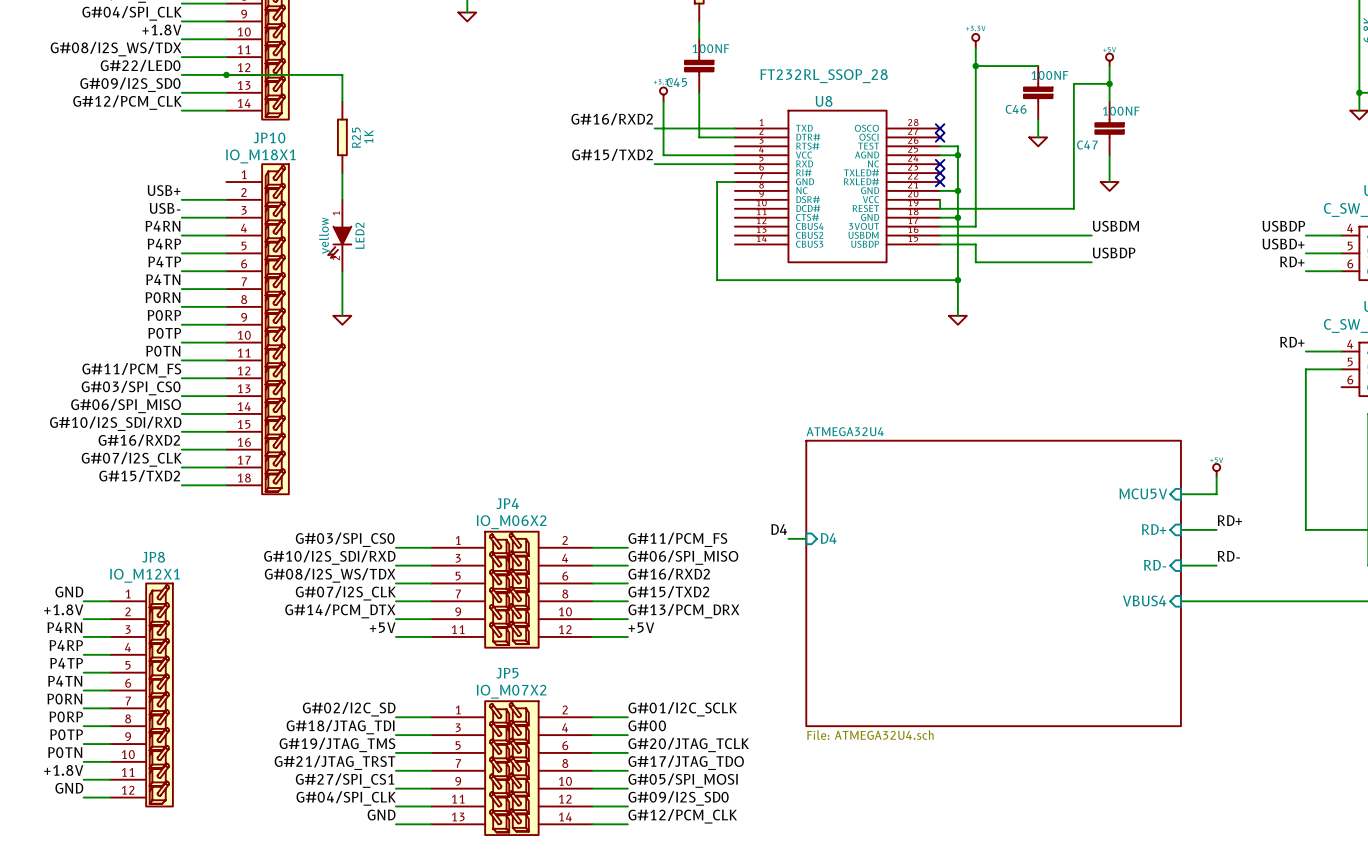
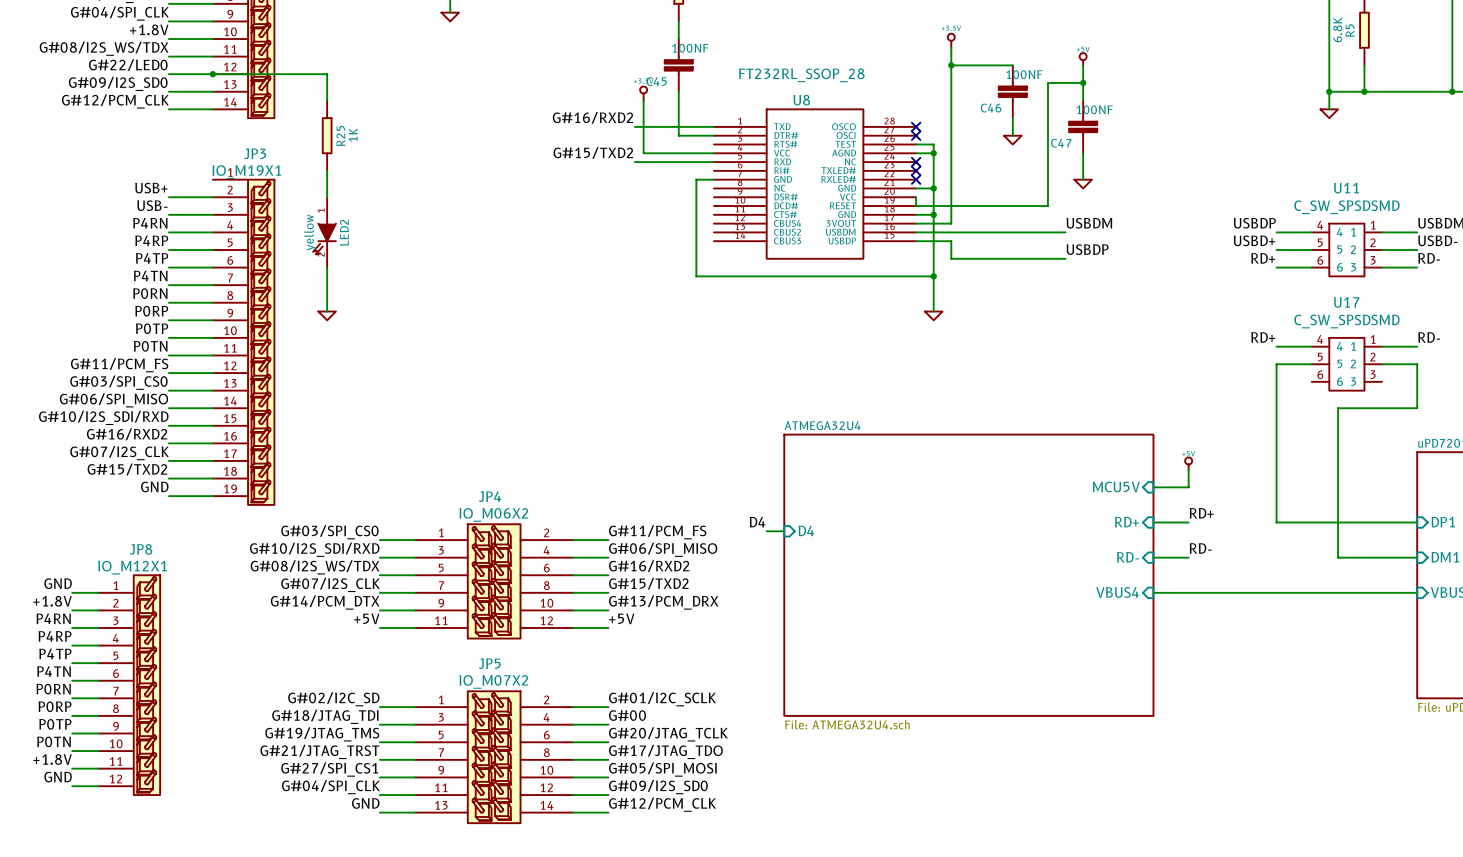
JP10: IO_M18X1 (257, 329) -> none
JP3: none -> IO_M19X1 (243, 342)
label: none -> GND (154, 486)
wire: none -> (168, 496) (212, 496)

